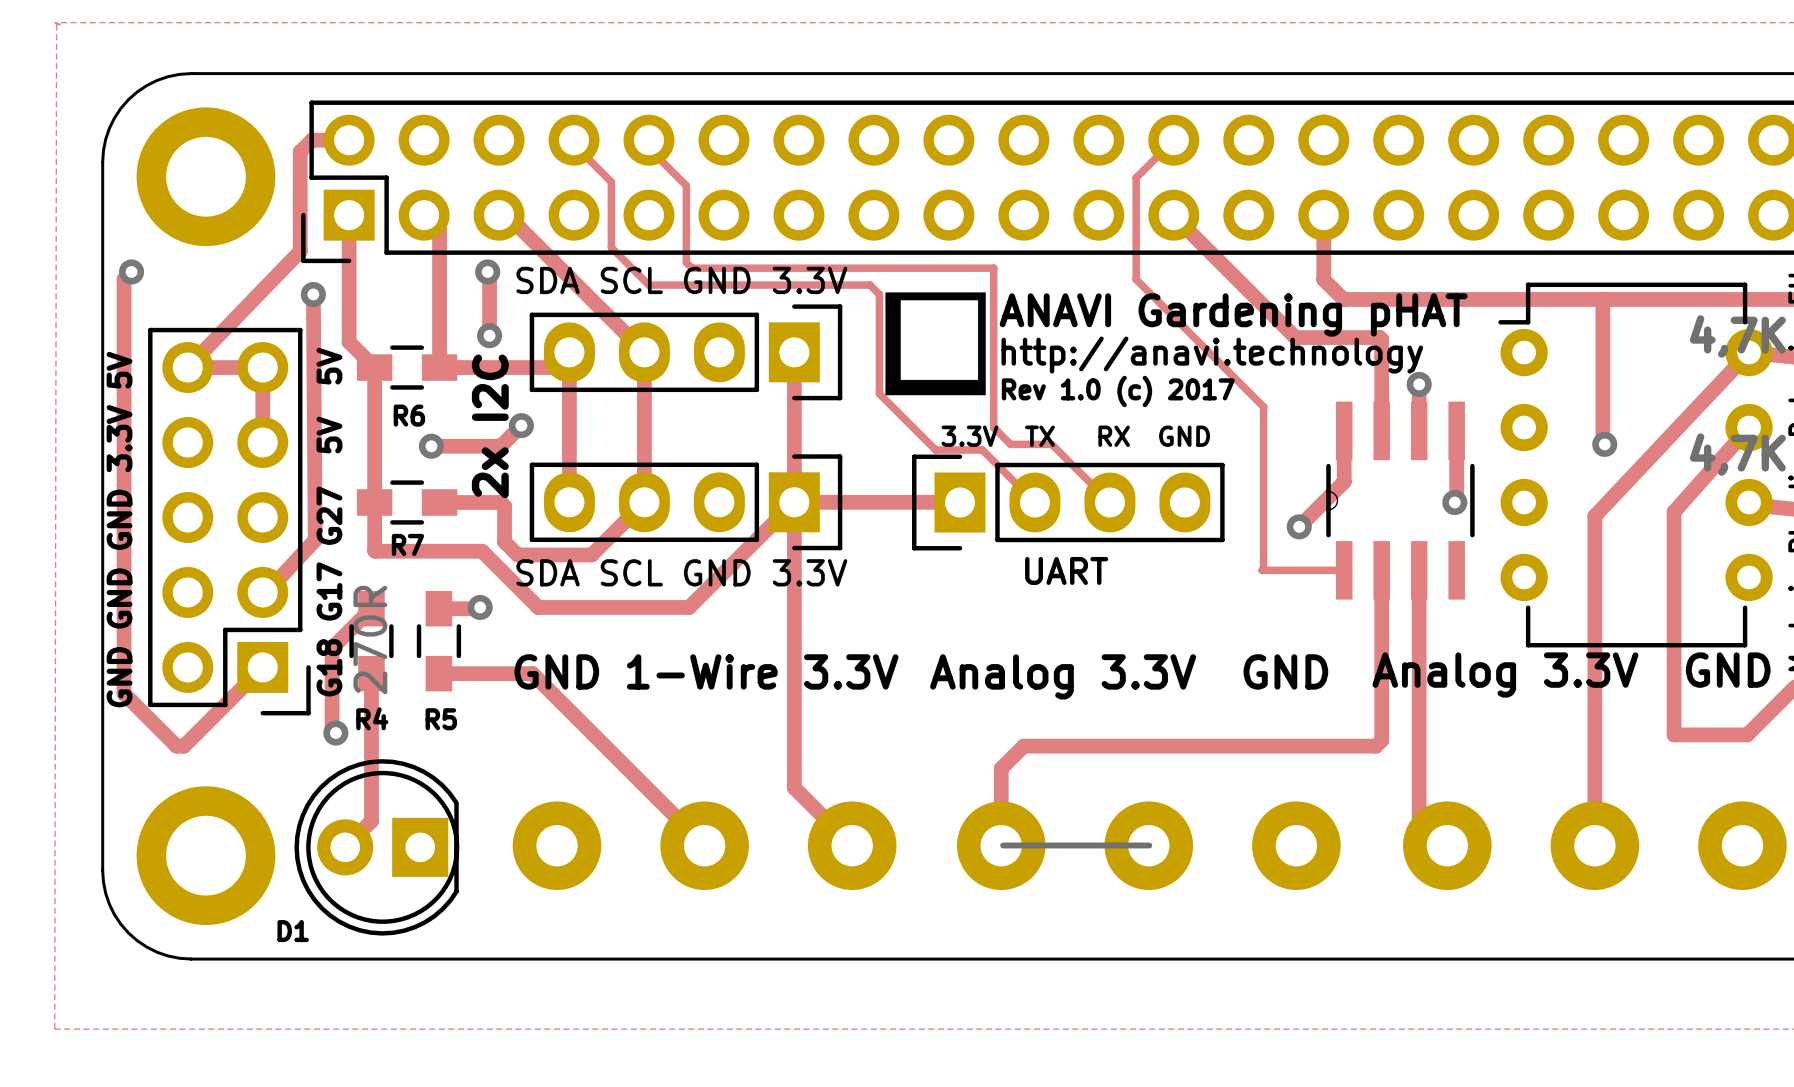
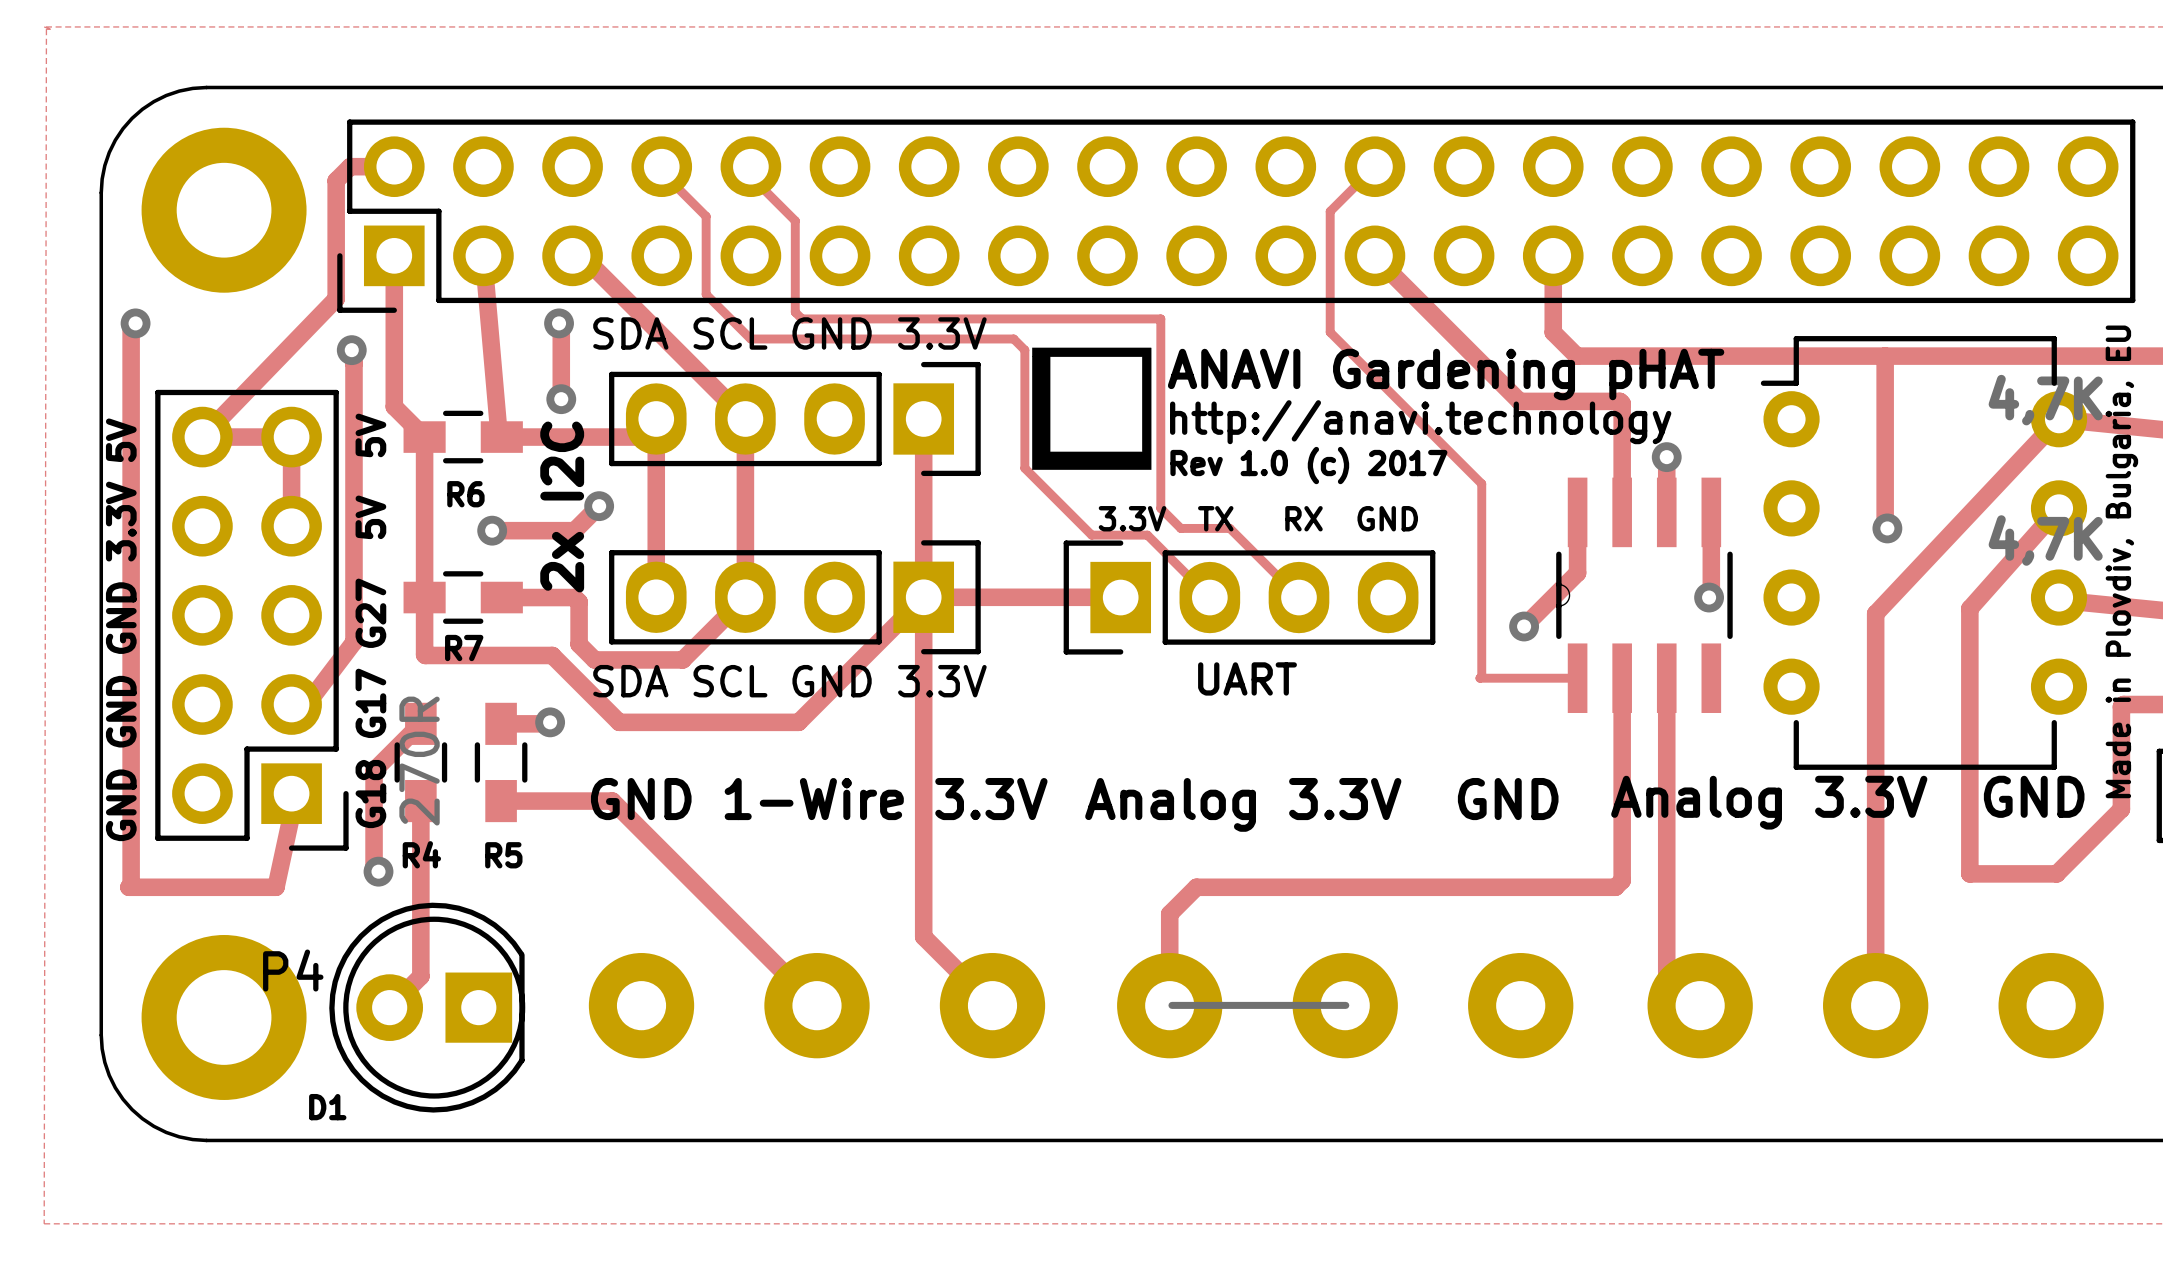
track: (424, 215) (439, 230) (439, 367) -> (483, 255) (499, 434)
track: (131, 271) (124, 279) (124, 693) (176, 746) -> (131, 321) (131, 885) (128, 887) (189, 887)
track: (313, 294) (315, 539) (266, 592) (262, 592) -> none
track: none -> (353, 361) (353, 642) (298, 715) (293, 715)
track: (262, 667) (184, 746) -> (293, 804) (275, 887) (197, 887)
P4 name: none -> P4 (293, 970)

